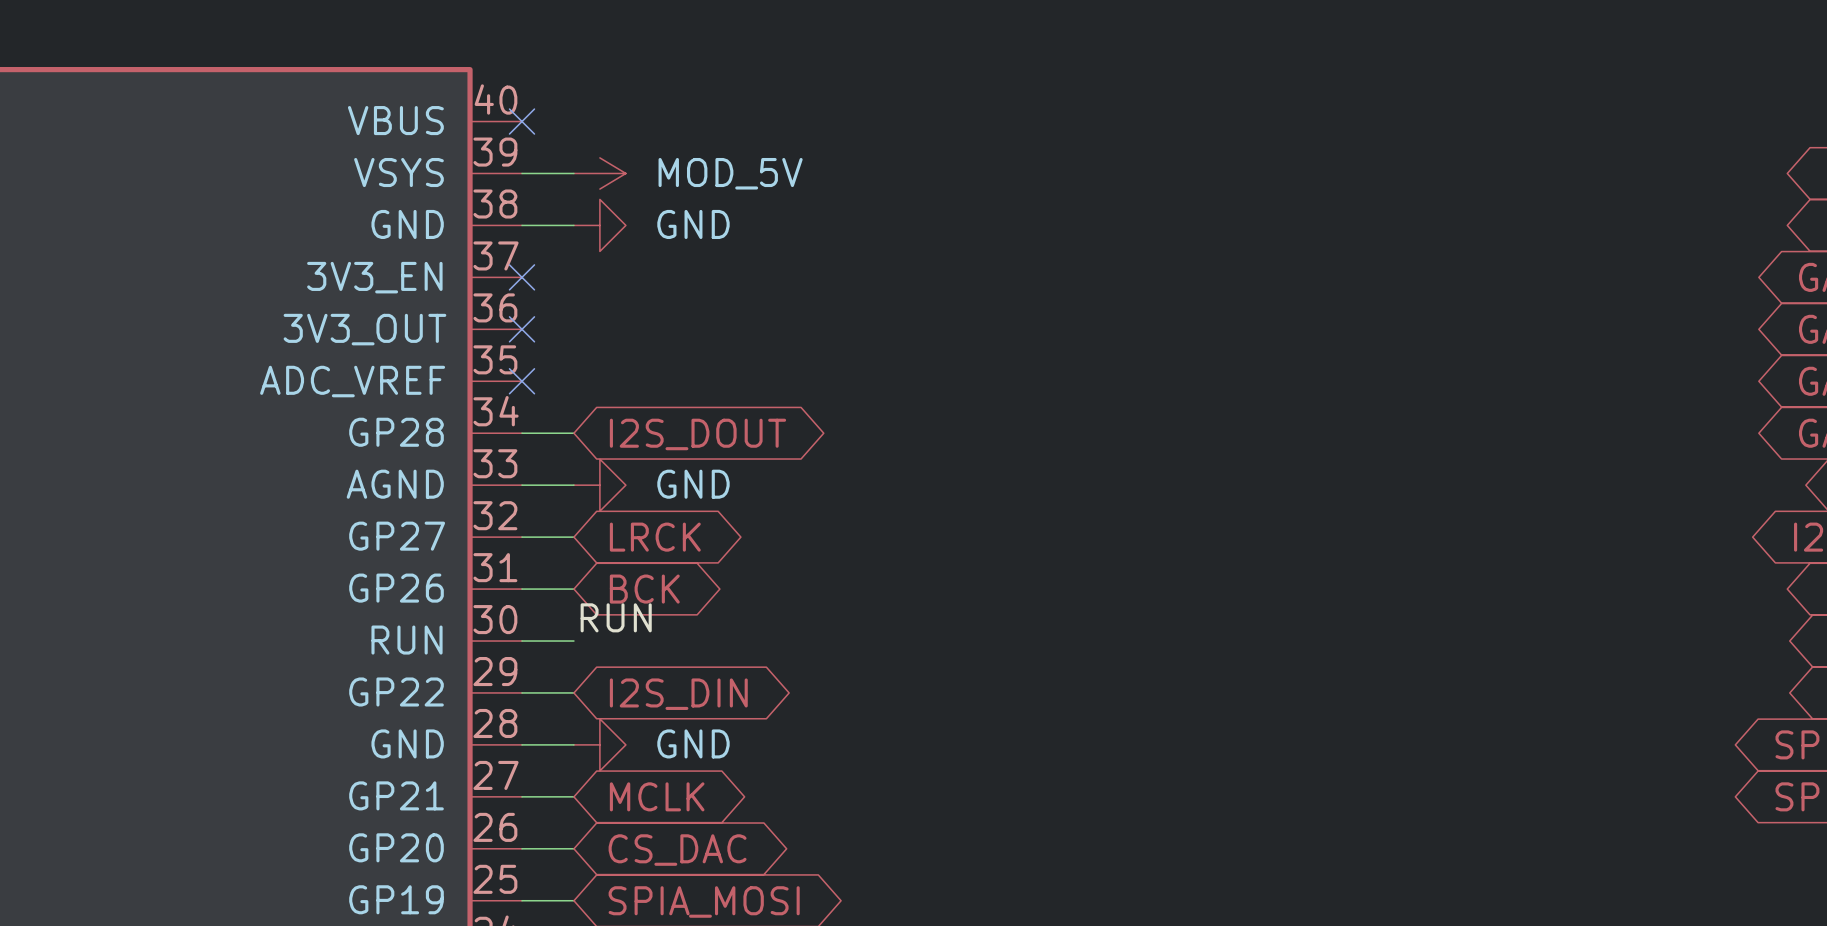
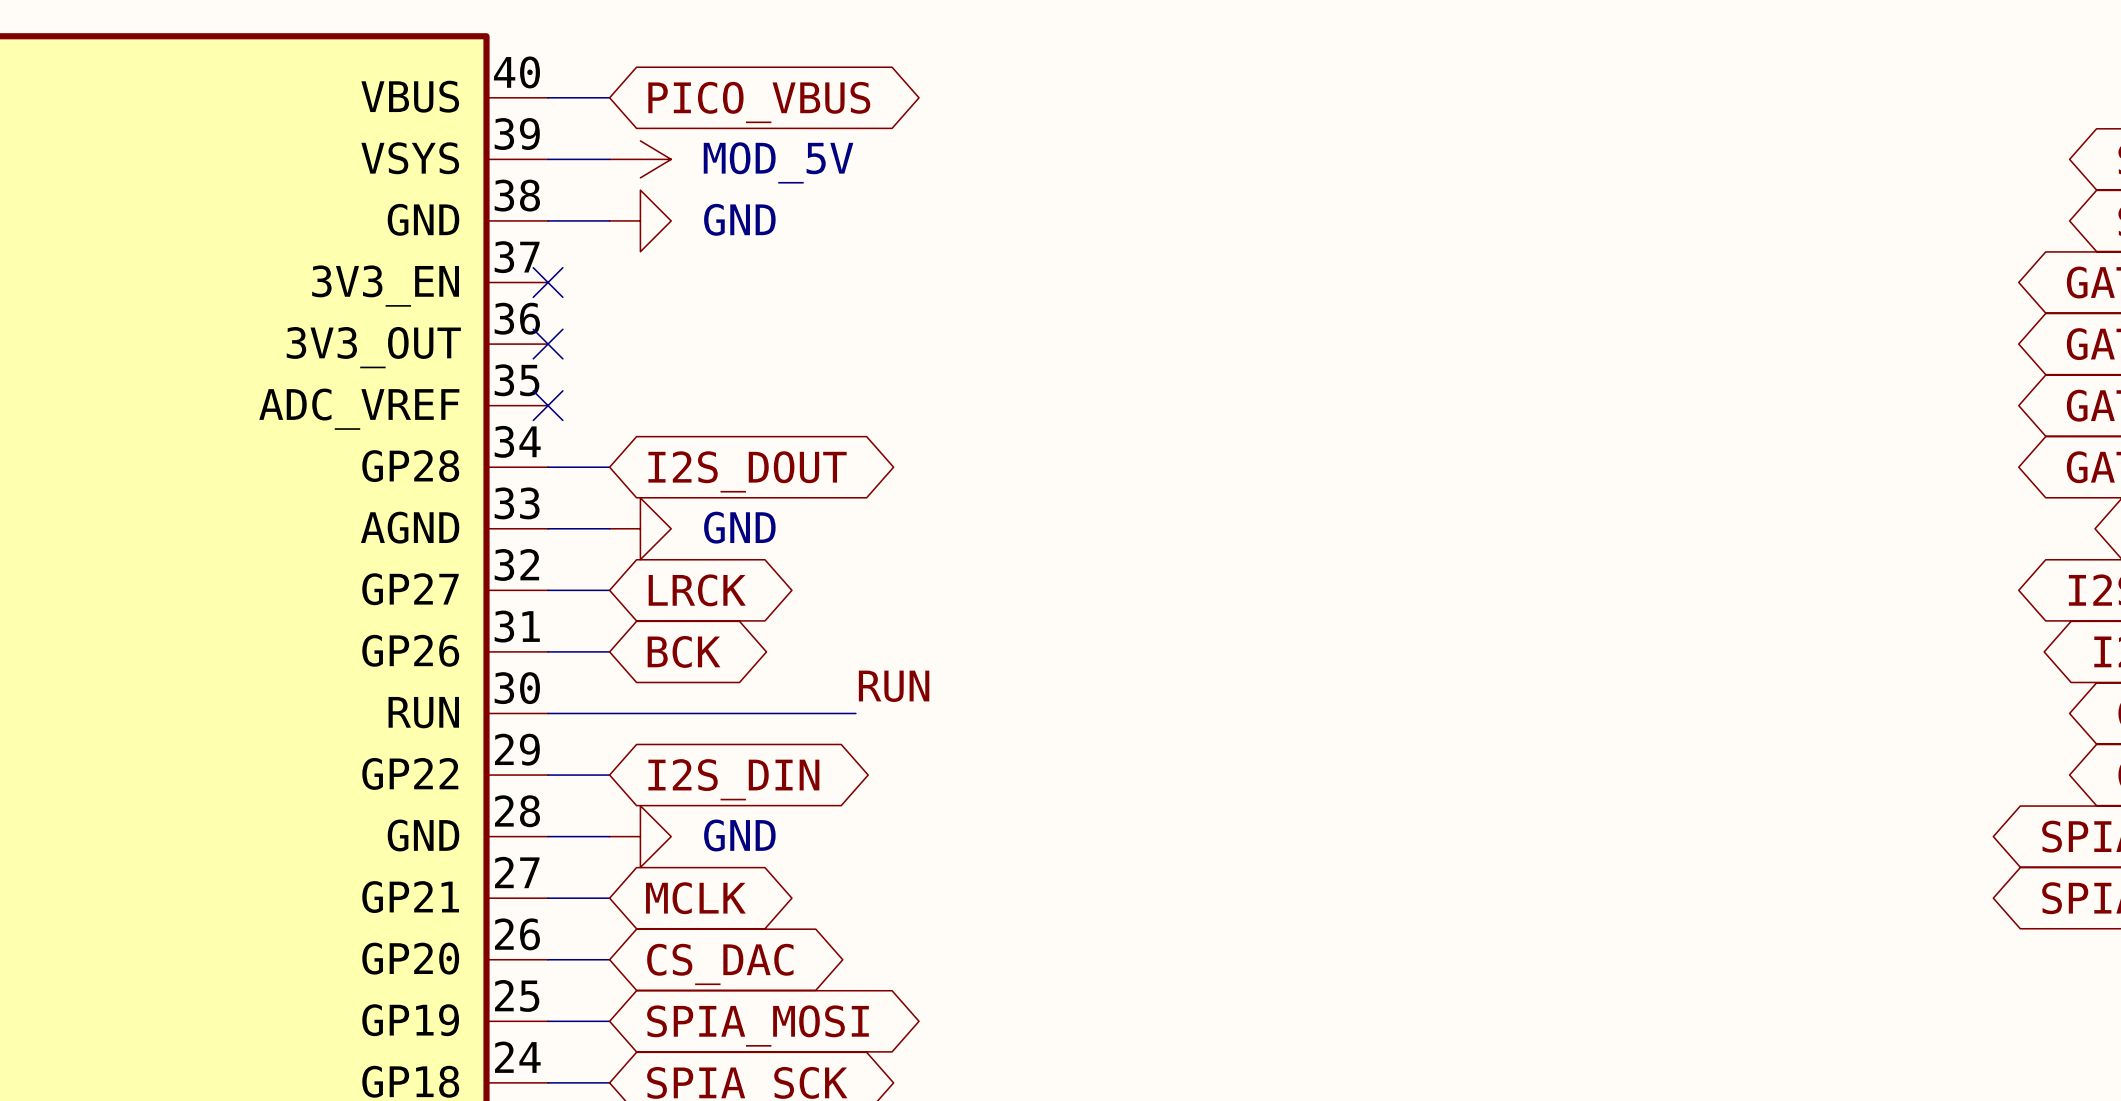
wire: none -> (548, 97) (609, 97)
no-connect mark: (521, 121) -> none
global label: none -> PICO_VBUS (759, 102)
label position: RUN (616, 617) -> RUN (894, 686)
wire: none -> (609, 713) (855, 713)

